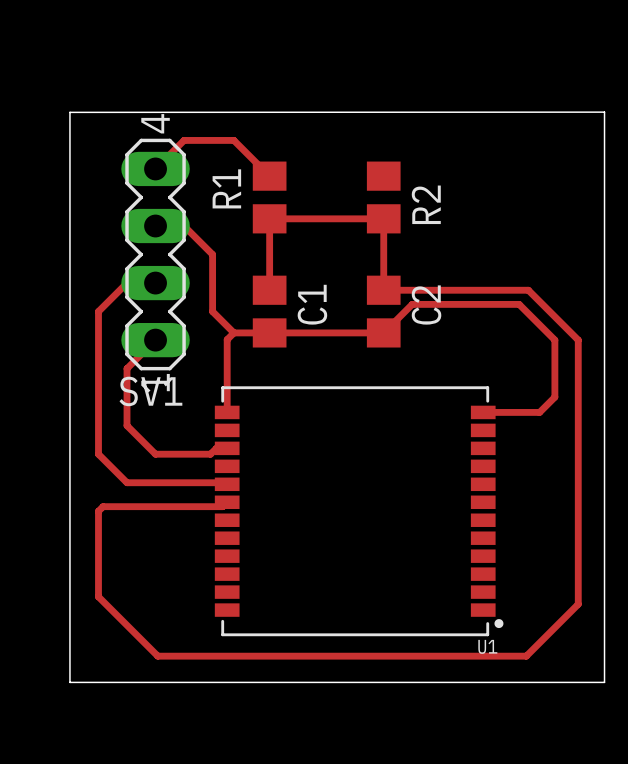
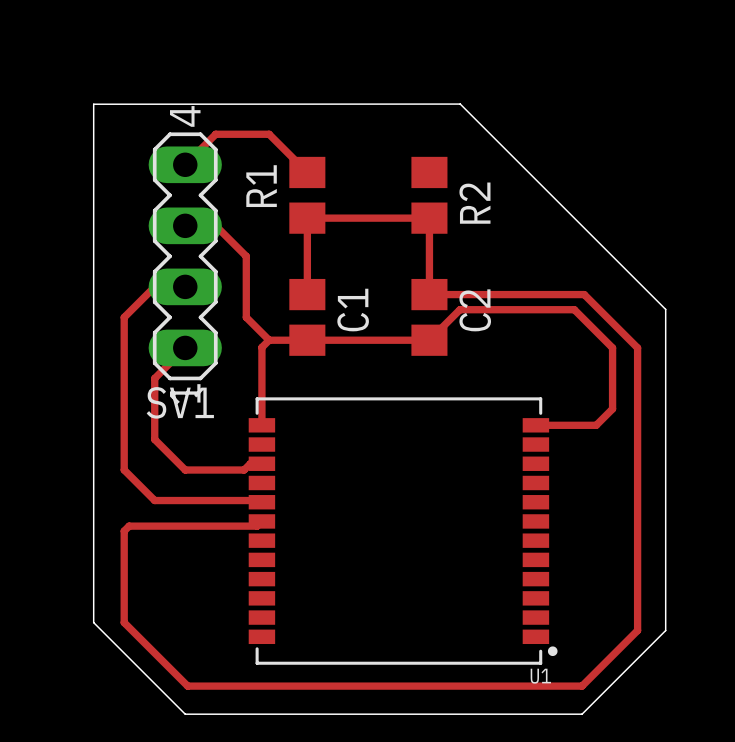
board edge: (412, 112) (604, 112) (604, 304) -> (460, 104) (665, 309)
board edge: (69, 596) (69, 682) (155, 682) -> (93, 622) (185, 714)
board edge: (604, 604) (604, 682) (526, 682) -> (665, 630) (582, 714)

